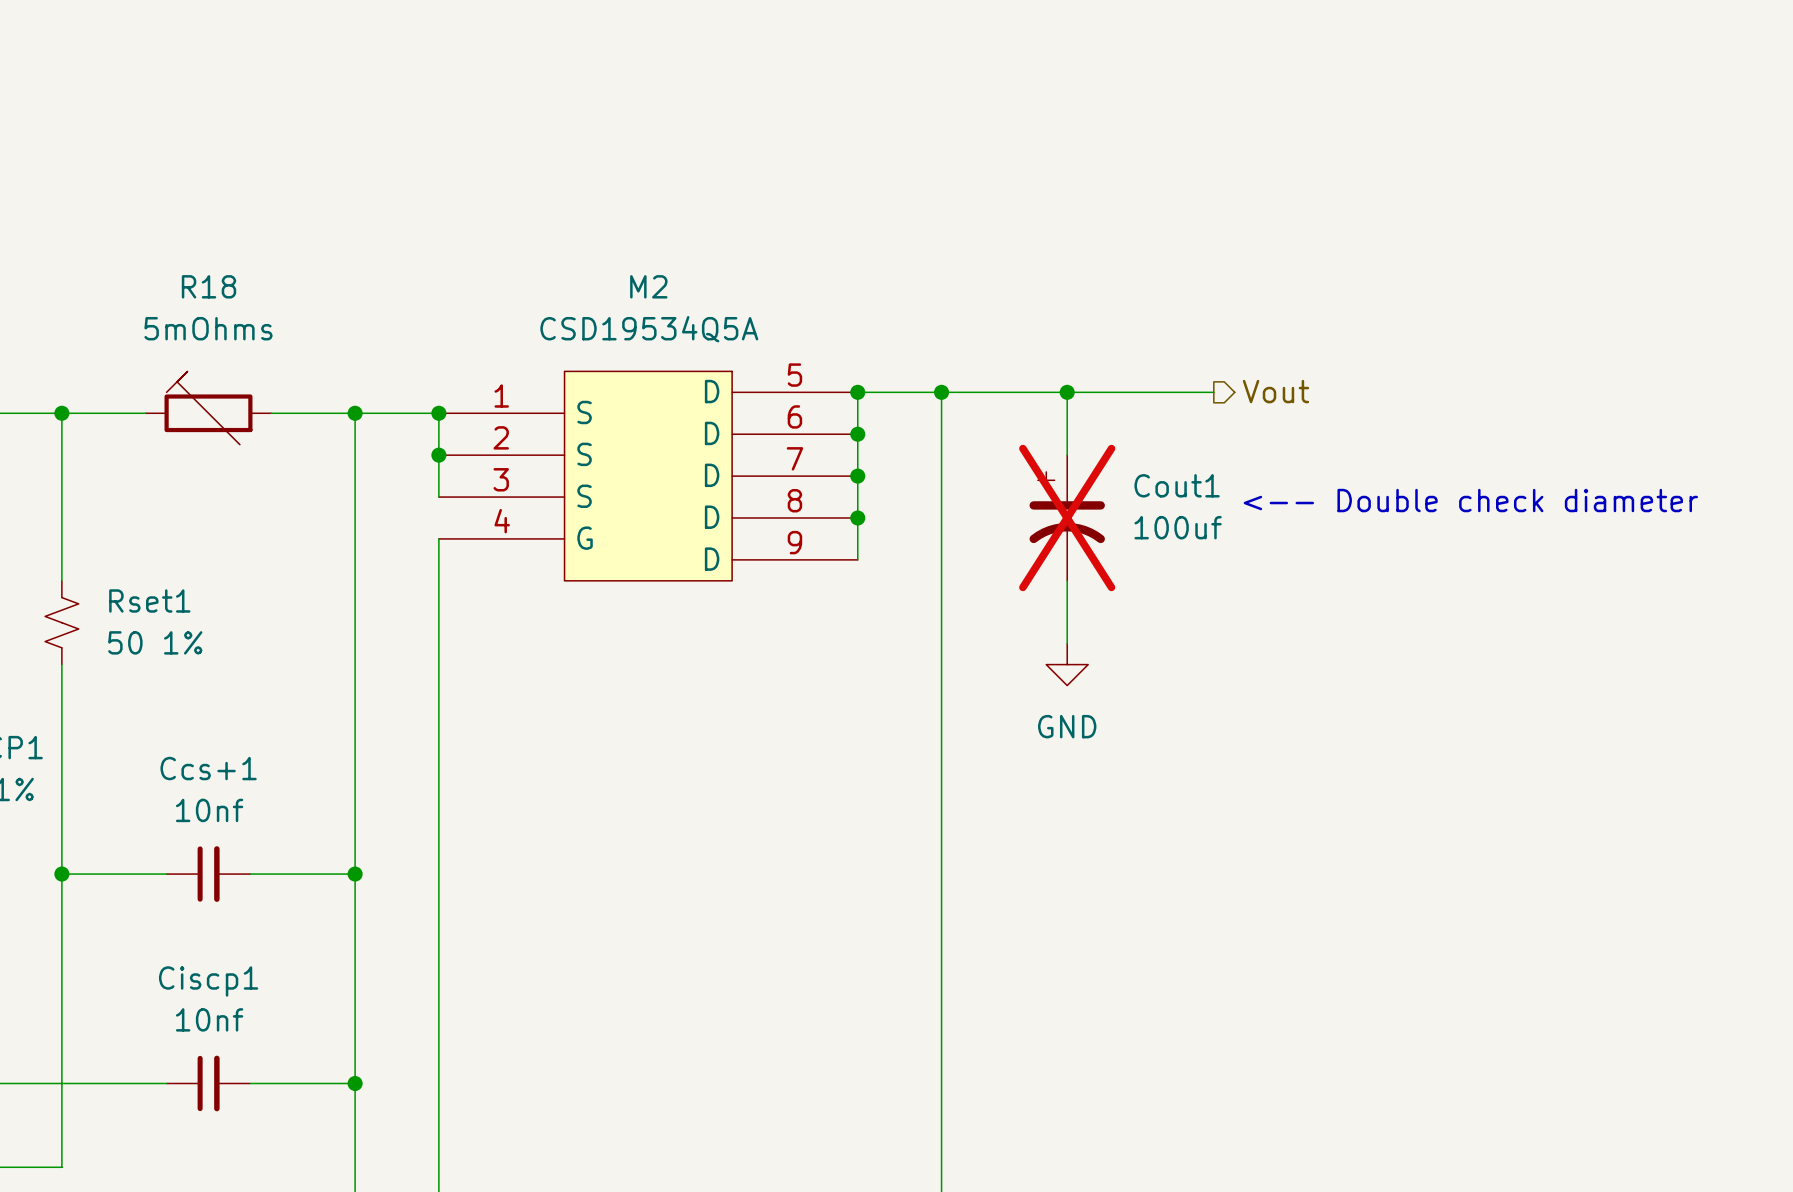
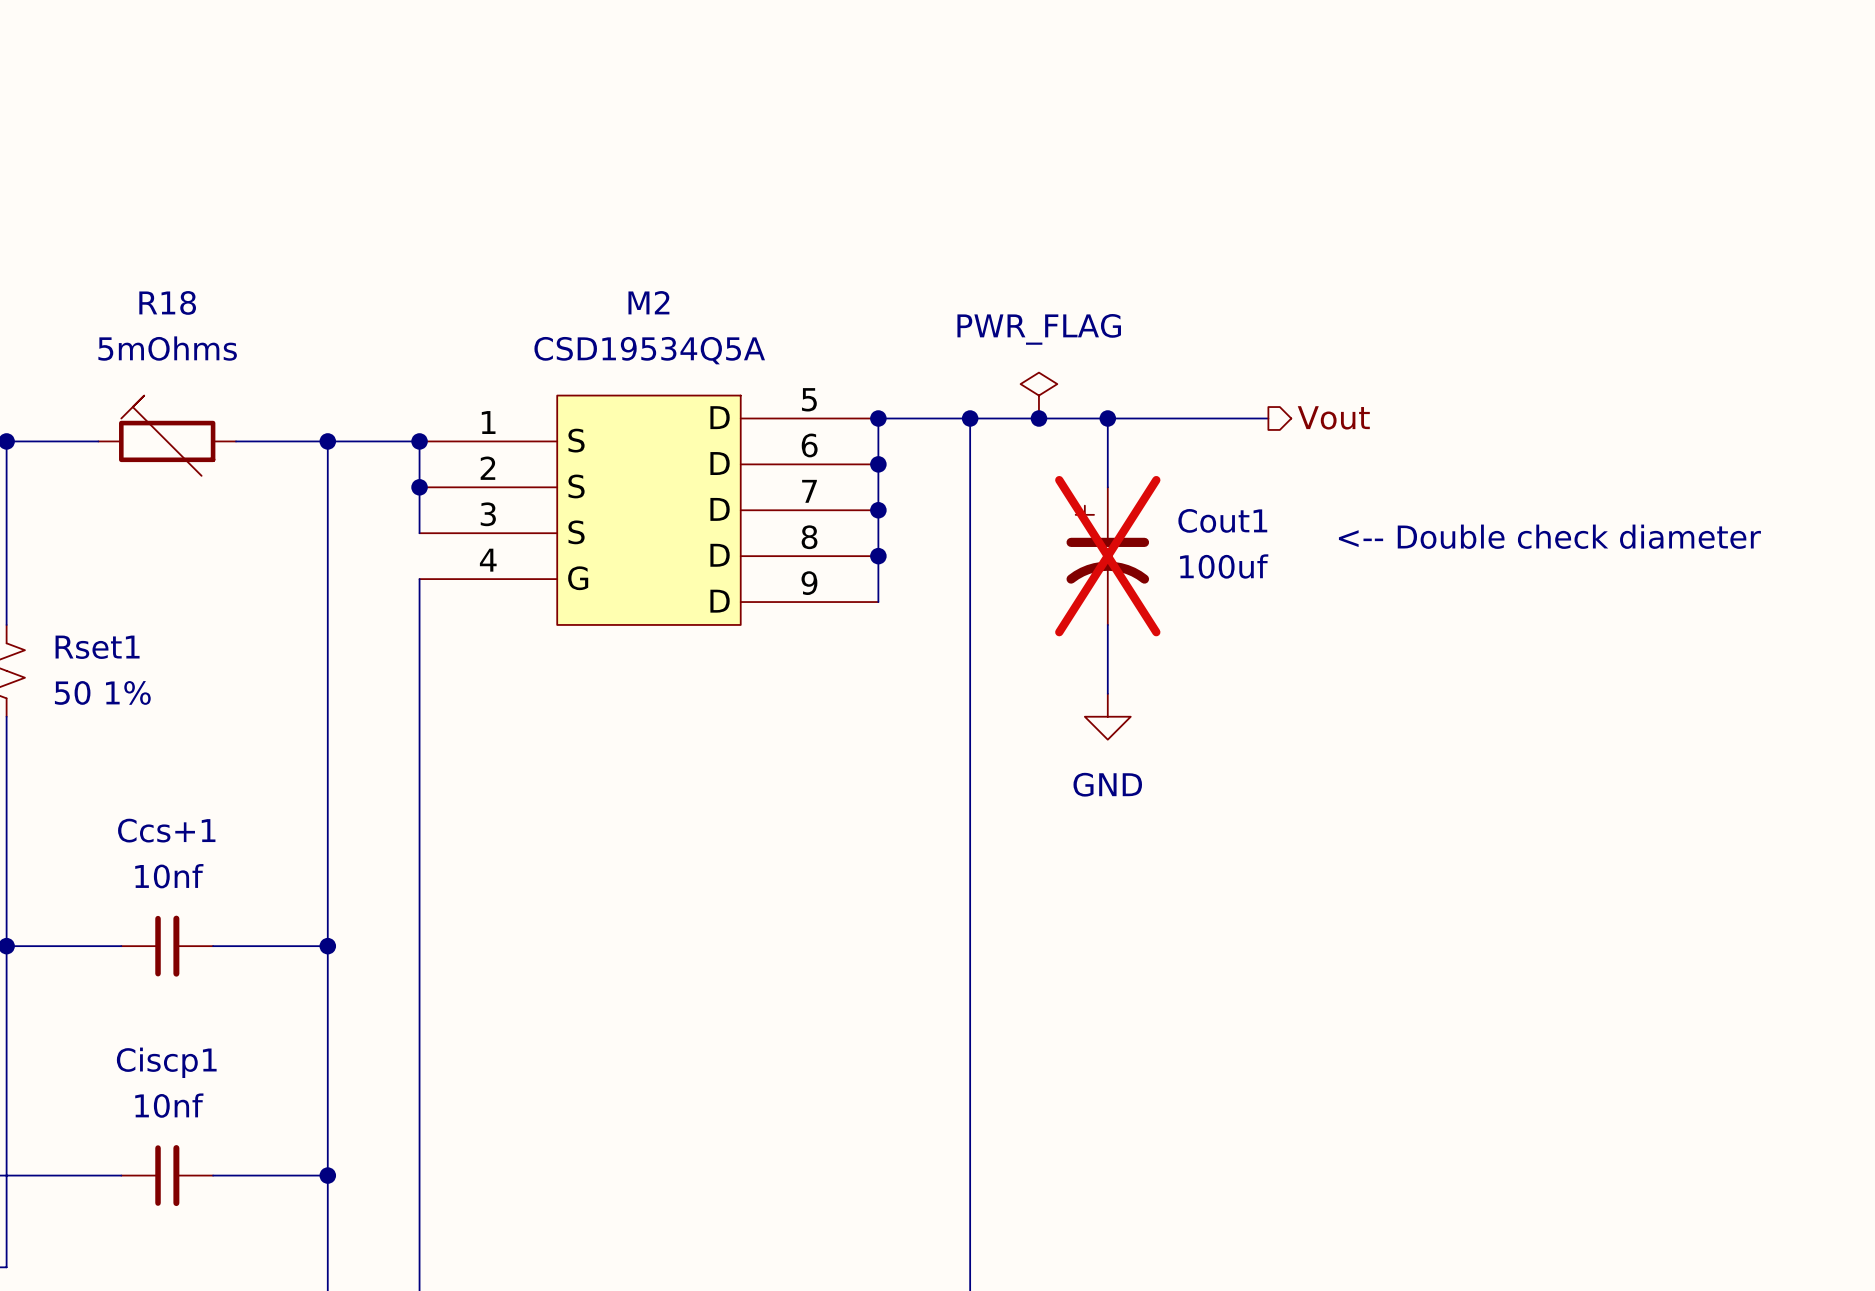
power symbol: none -> PWR_FLAG (1038, 395)
junction: none -> (1038, 418)

